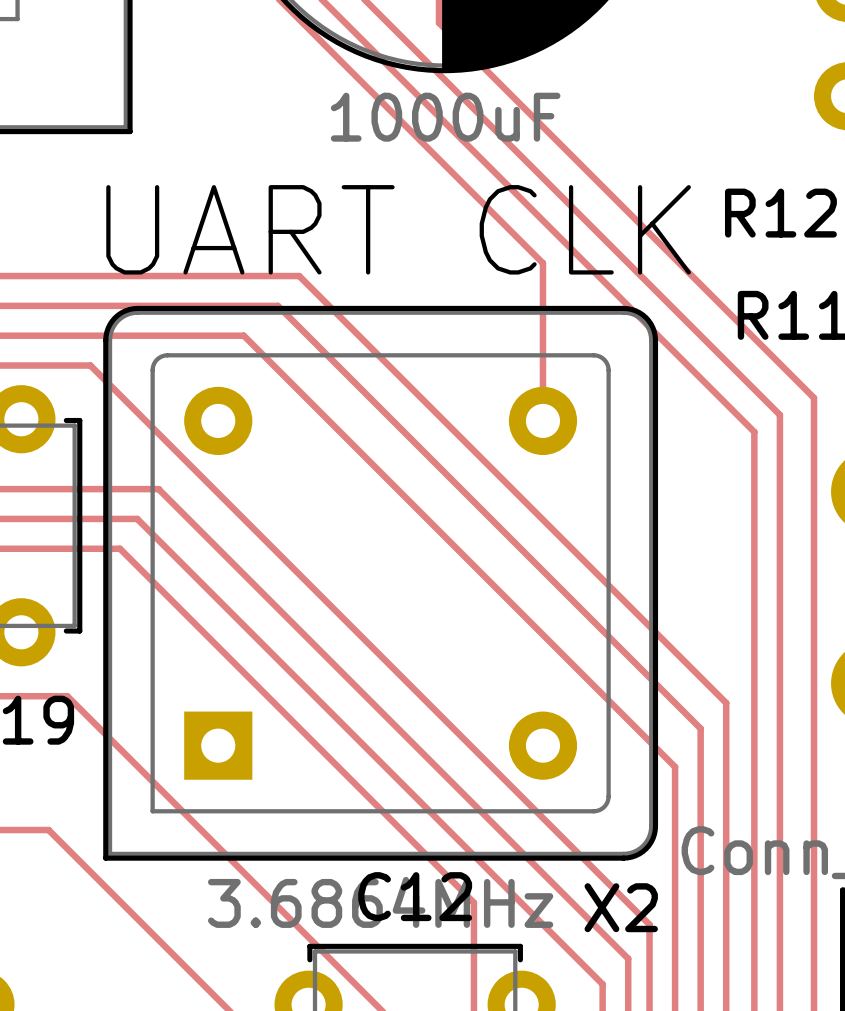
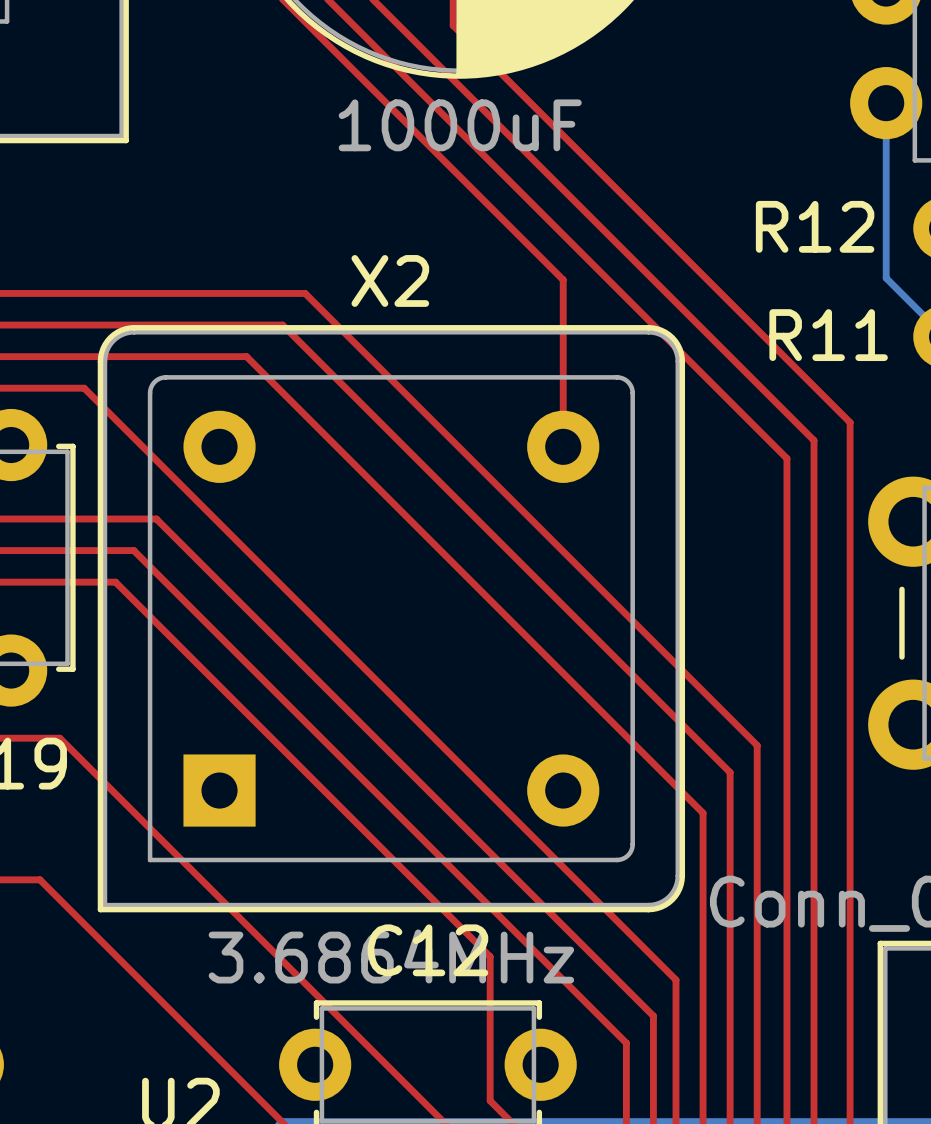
text: UART CLK (398, 229) -> none
X2 name position: X2 (621, 907) -> X2 (390, 280)

